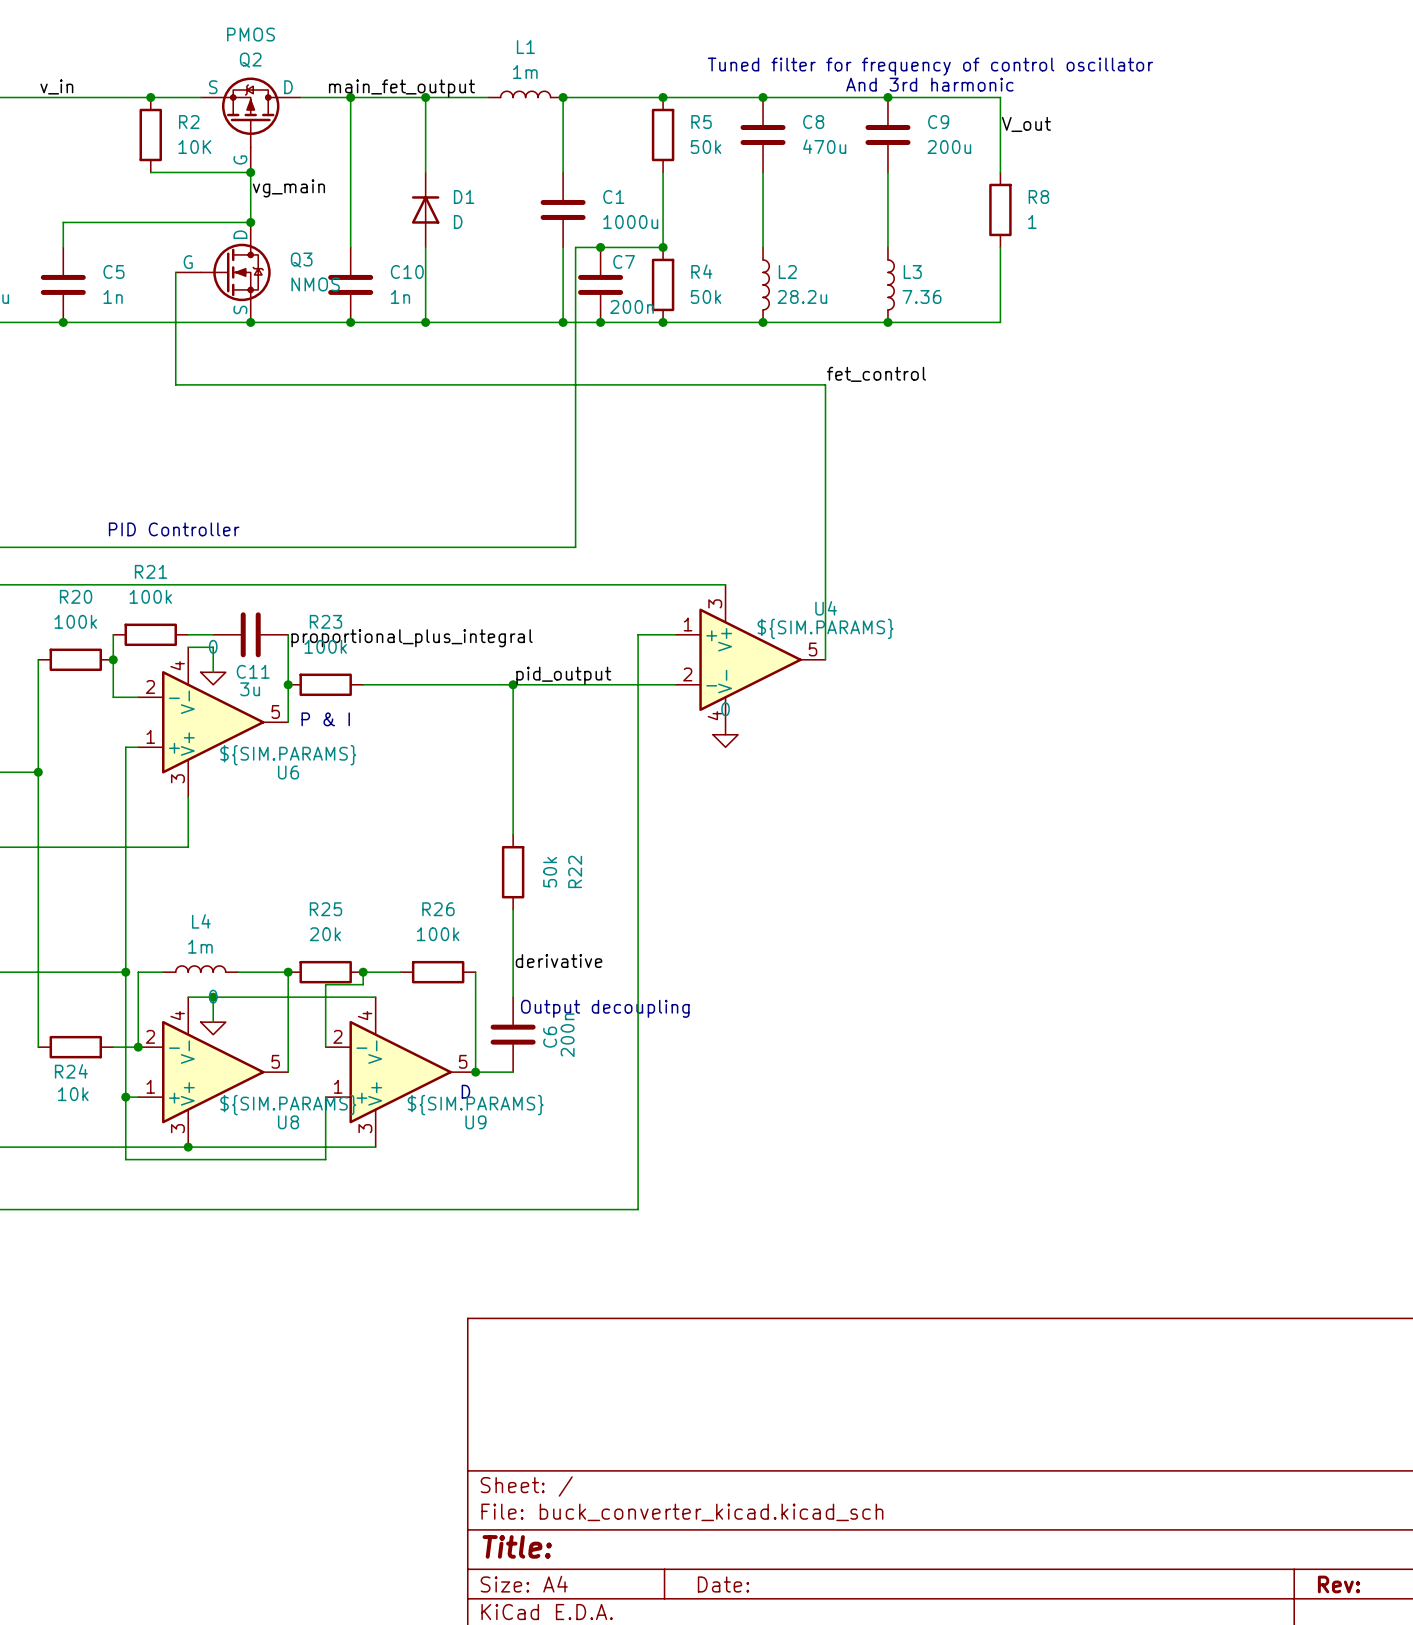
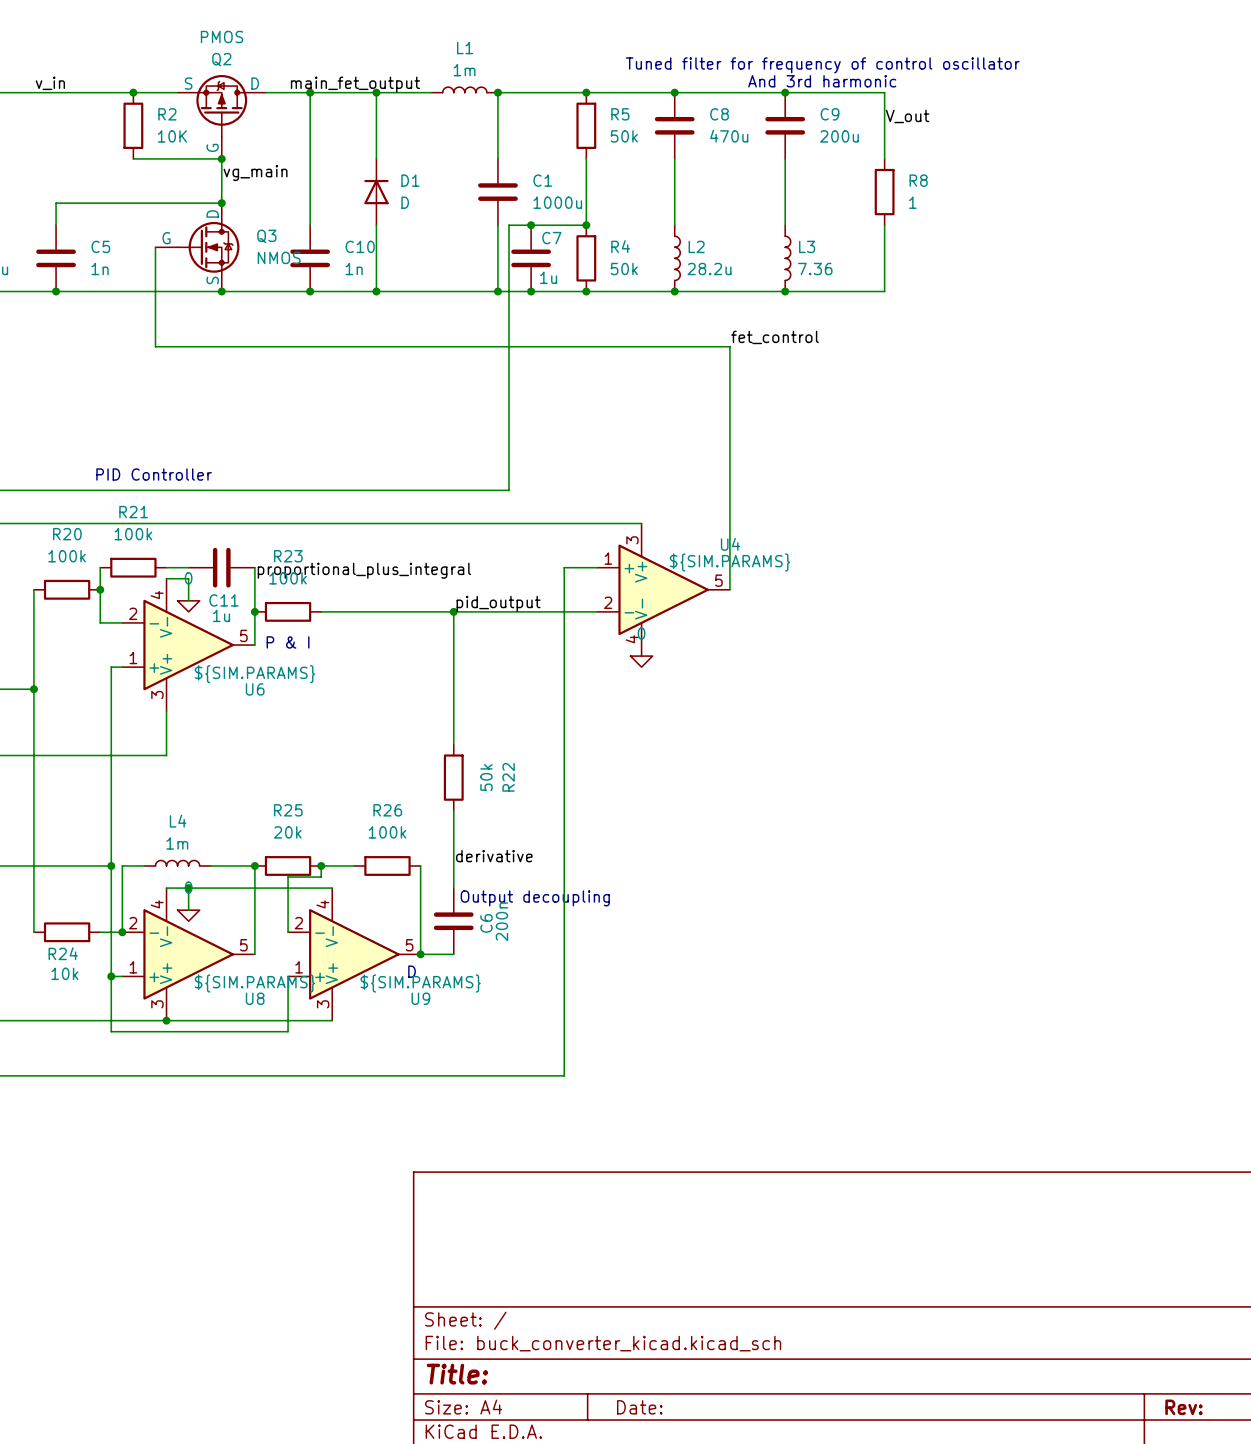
C7 value: 200n (631, 306) -> 1u (548, 277)
C11 value: 3u (250, 689) -> 1u (221, 615)

